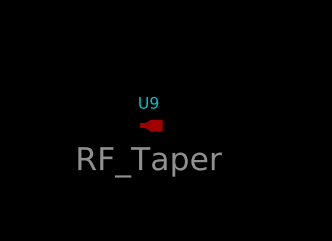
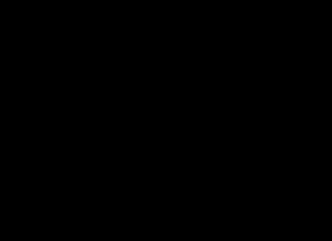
U9: RF_Taper (151, 125) -> none

